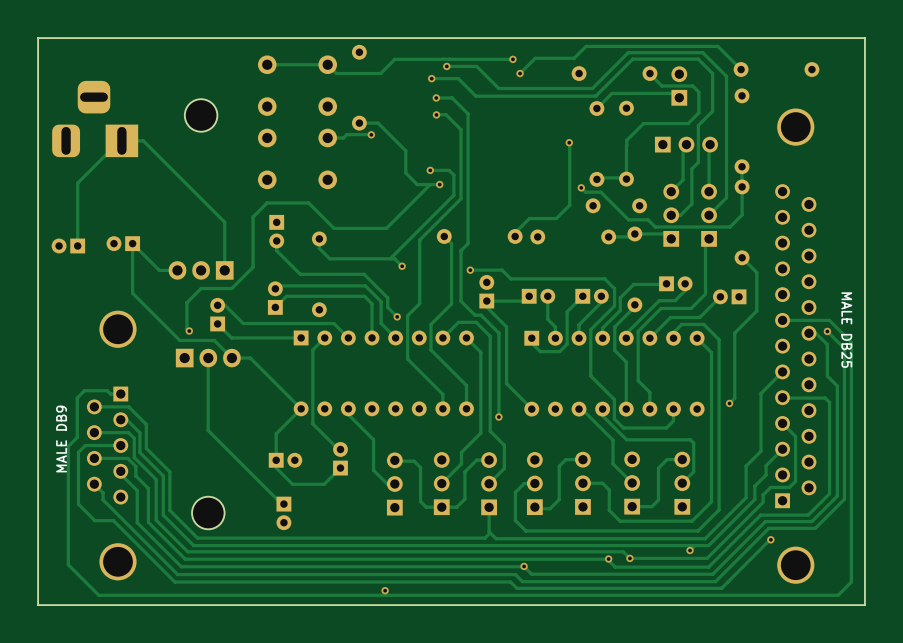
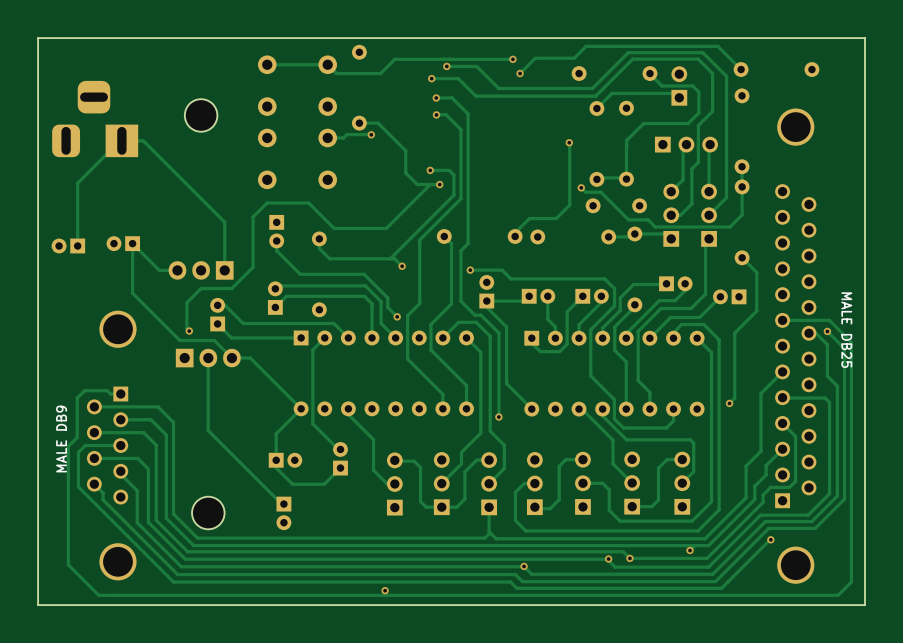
track: (128, 406) (146, 424) (146, 448) (169, 471) (169, 510) (173, 514) -> (128, 406) (157, 406) (173, 422) (173, 514)
track: (126, 419) (139, 432) (139, 452) (163, 475) (163, 515) (166, 518) -> (126, 419) (151, 419) (166, 435) (166, 518)
track: (128, 432) (134, 438) (134, 457) (156, 479) -> (128, 432) (143, 432) (156, 445) (156, 479)
track: (127, 458) (135, 466) (135, 475) (148, 488) -> (127, 458) (137, 458) (148, 469) (148, 488)
track: (78, 486) (78, 504) (94, 520) (113, 520) (174, 582) -> (78, 486) (174, 582)

